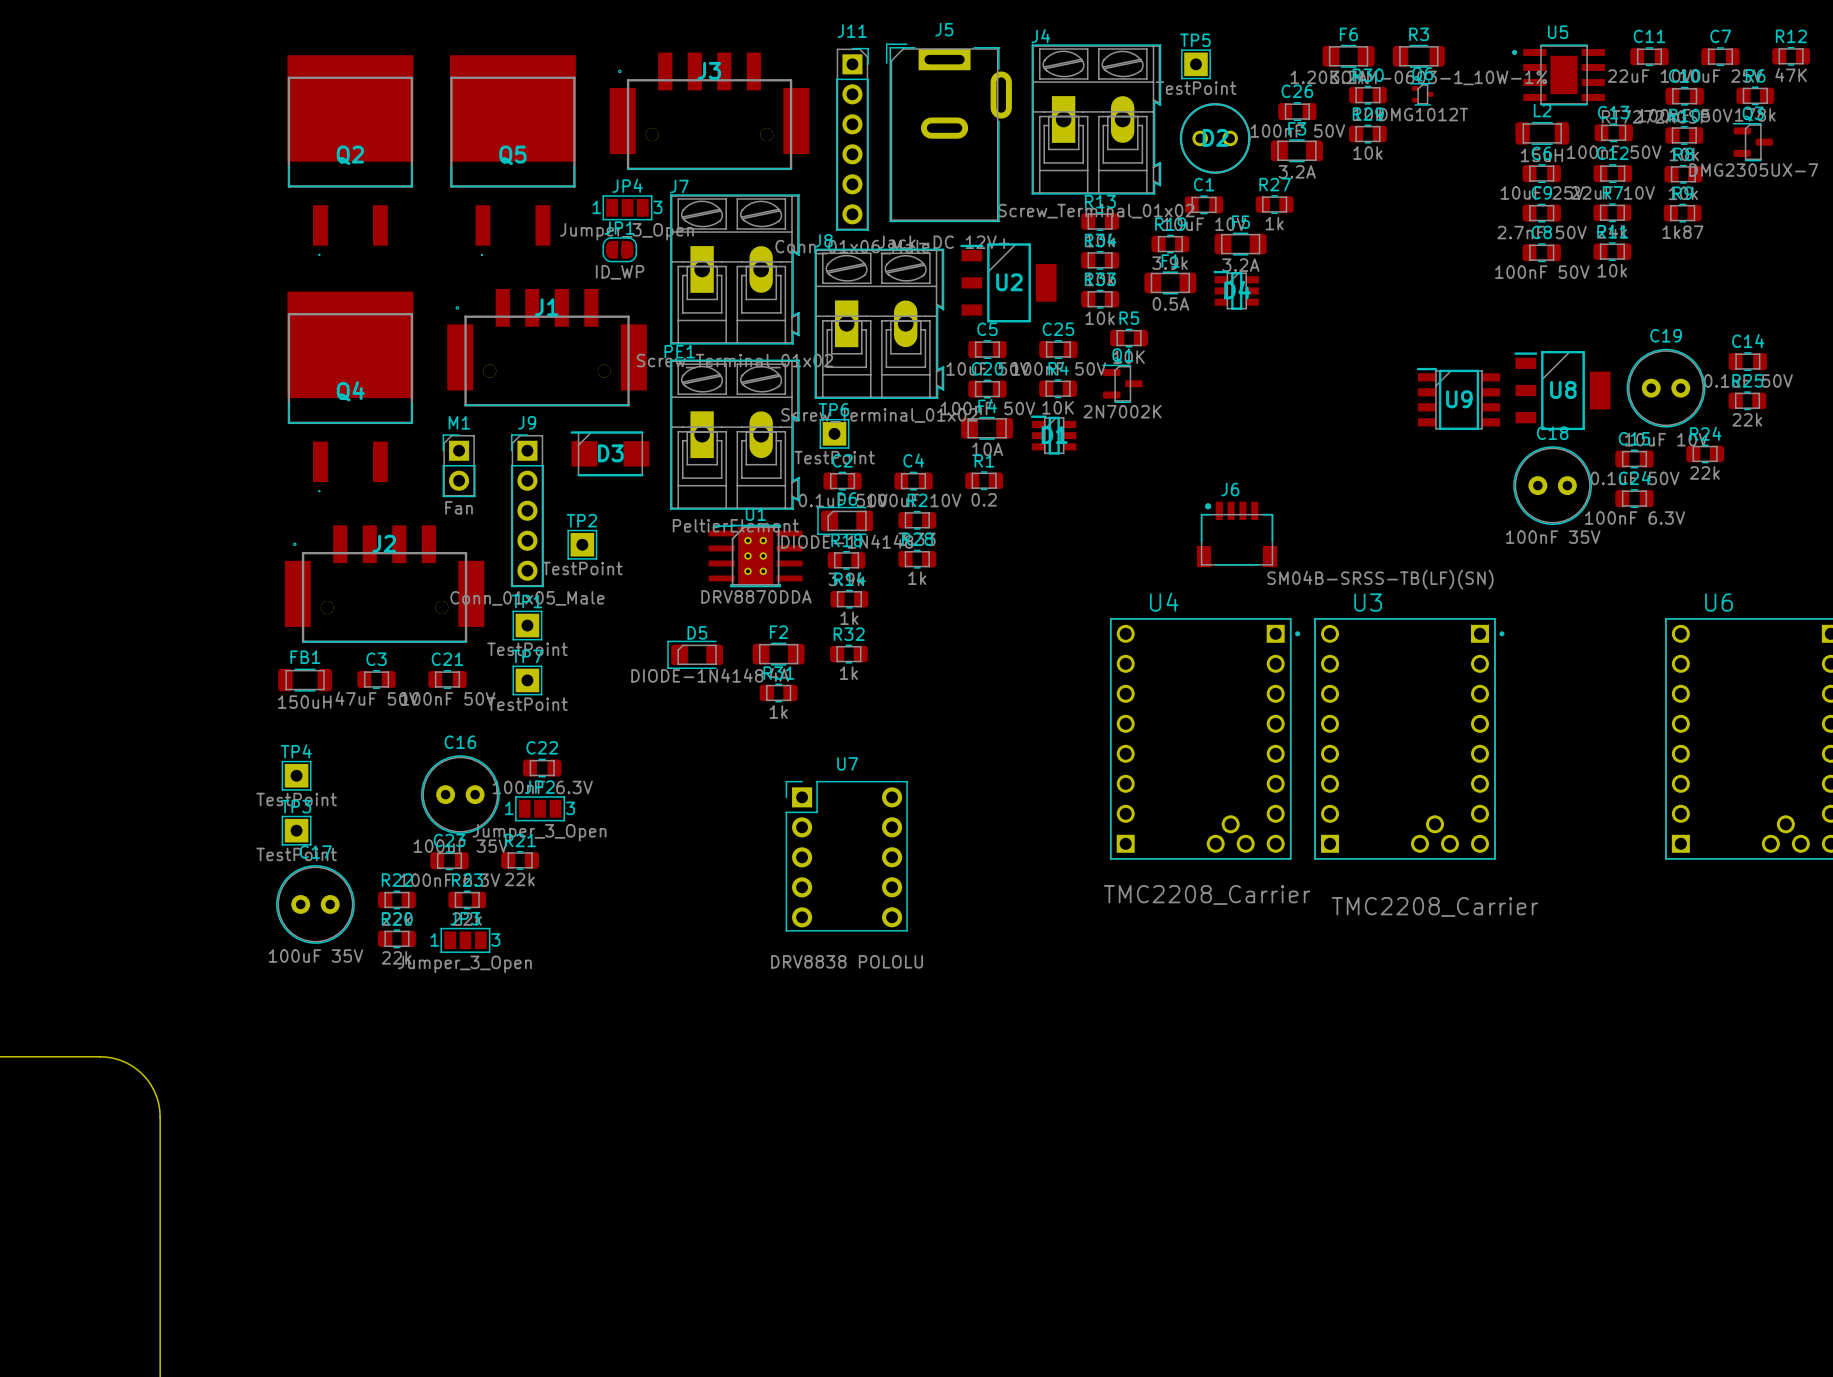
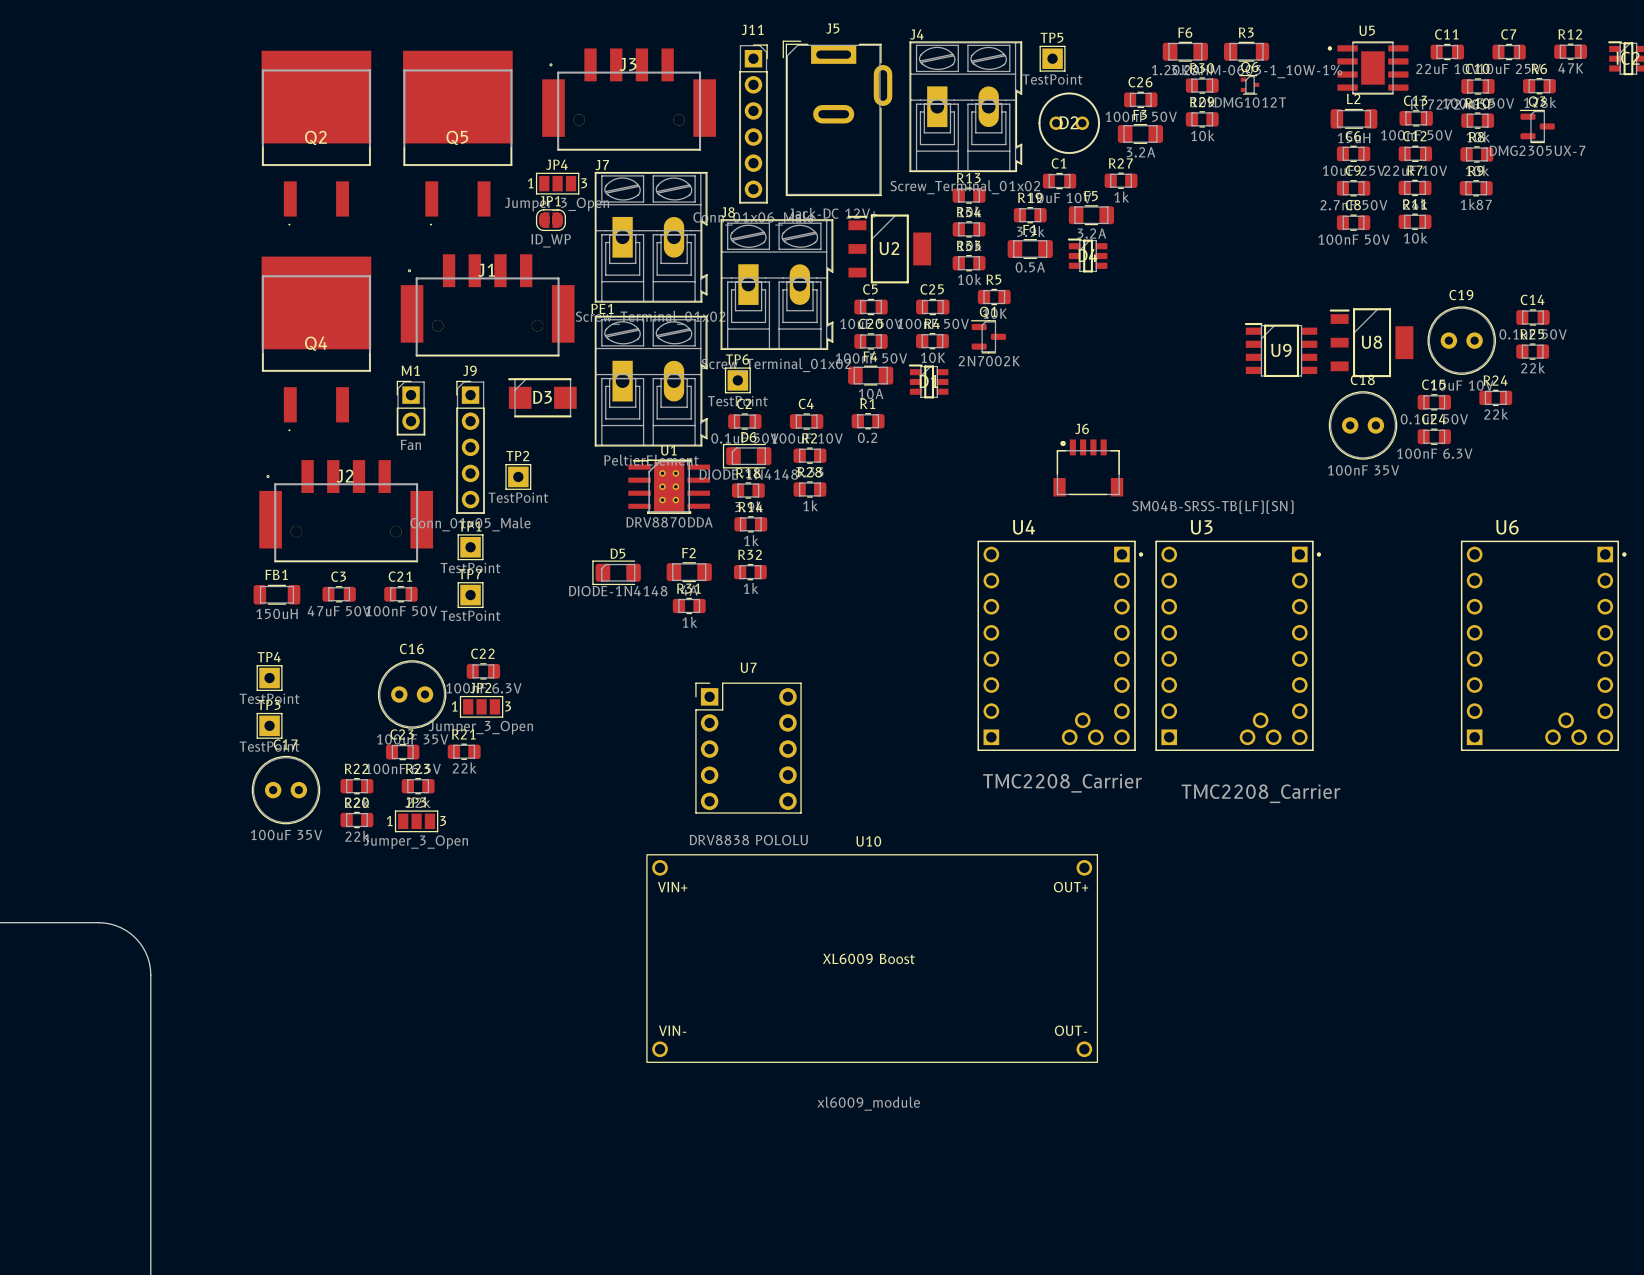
U10: none -> xl6009_module (872, 958)

